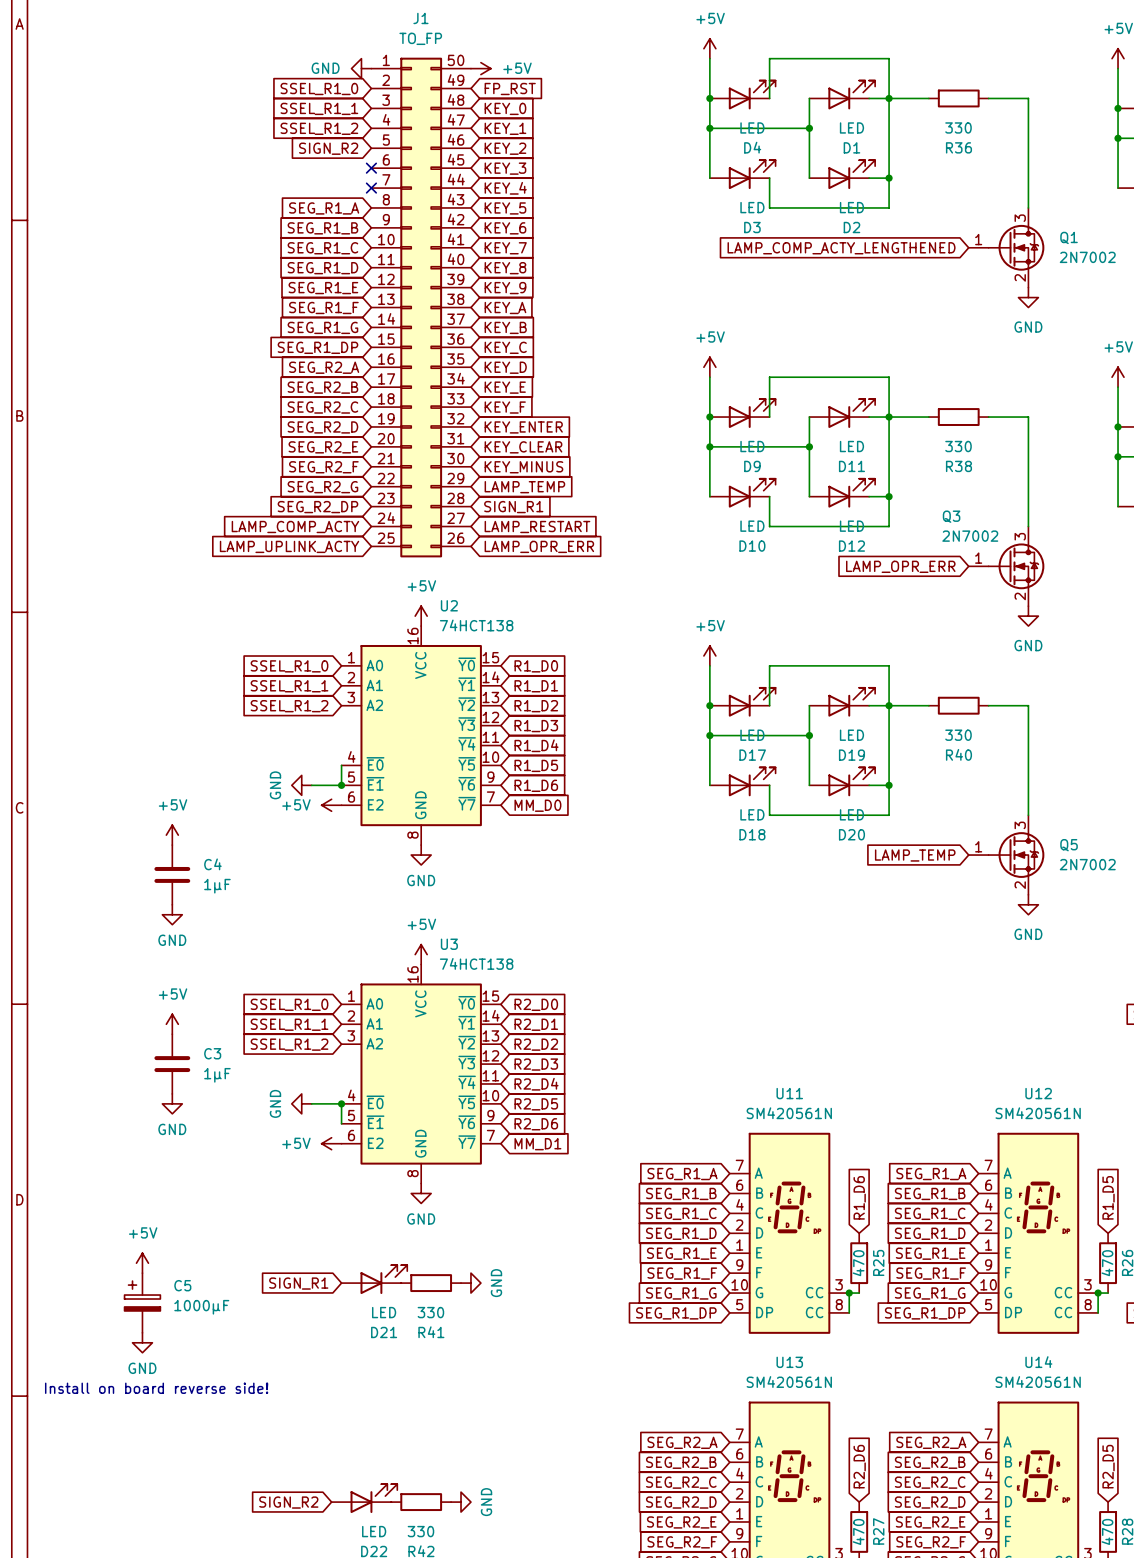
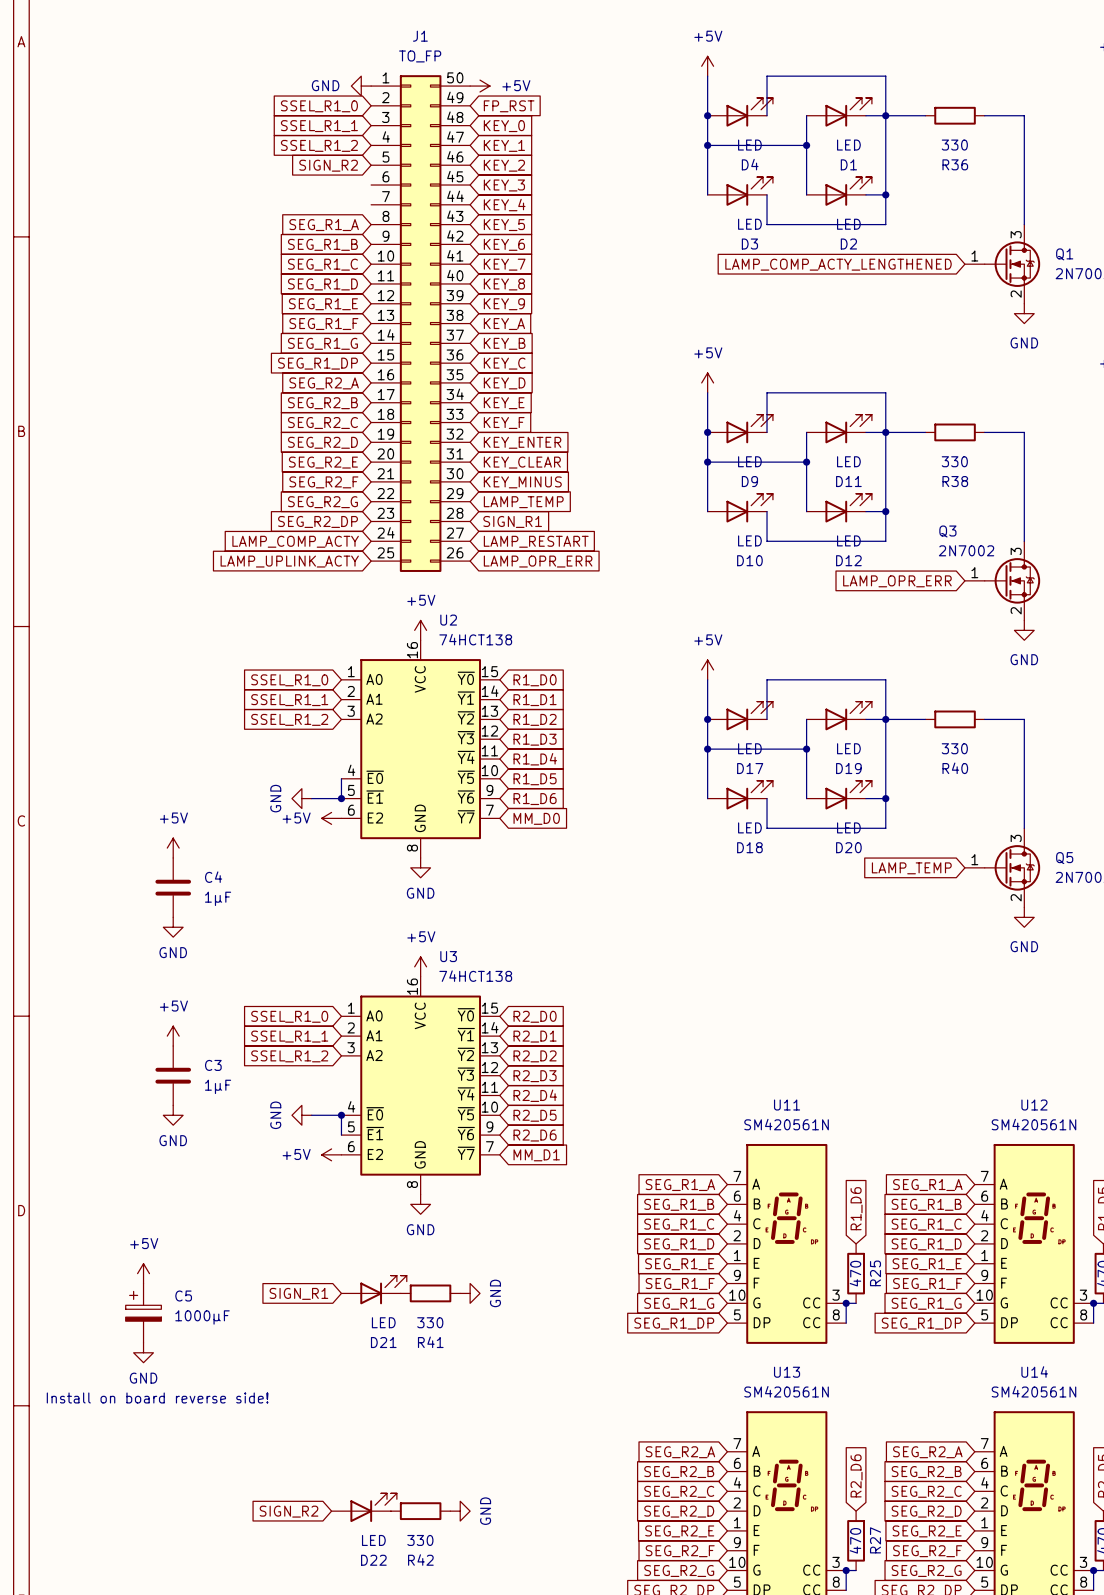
no-connect mark: (371, 168) -> none
no-connect mark: (371, 188) -> none

